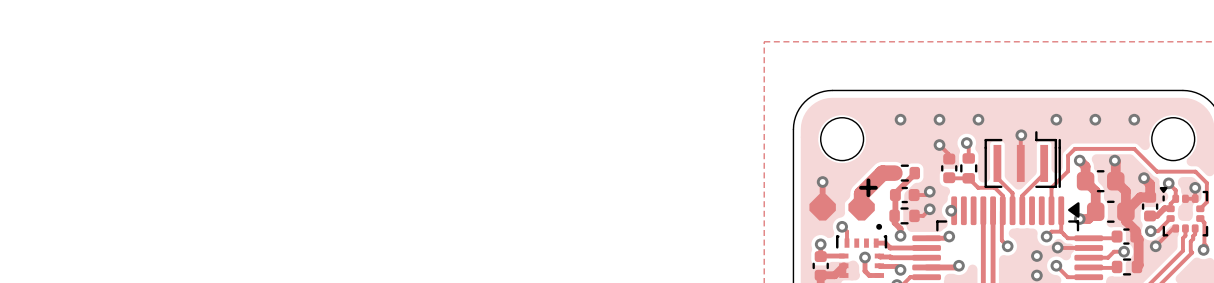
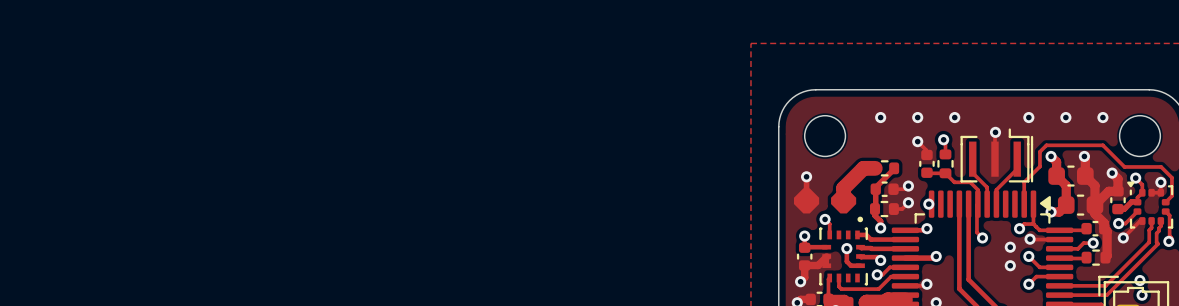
text: + (868, 187) -> none

